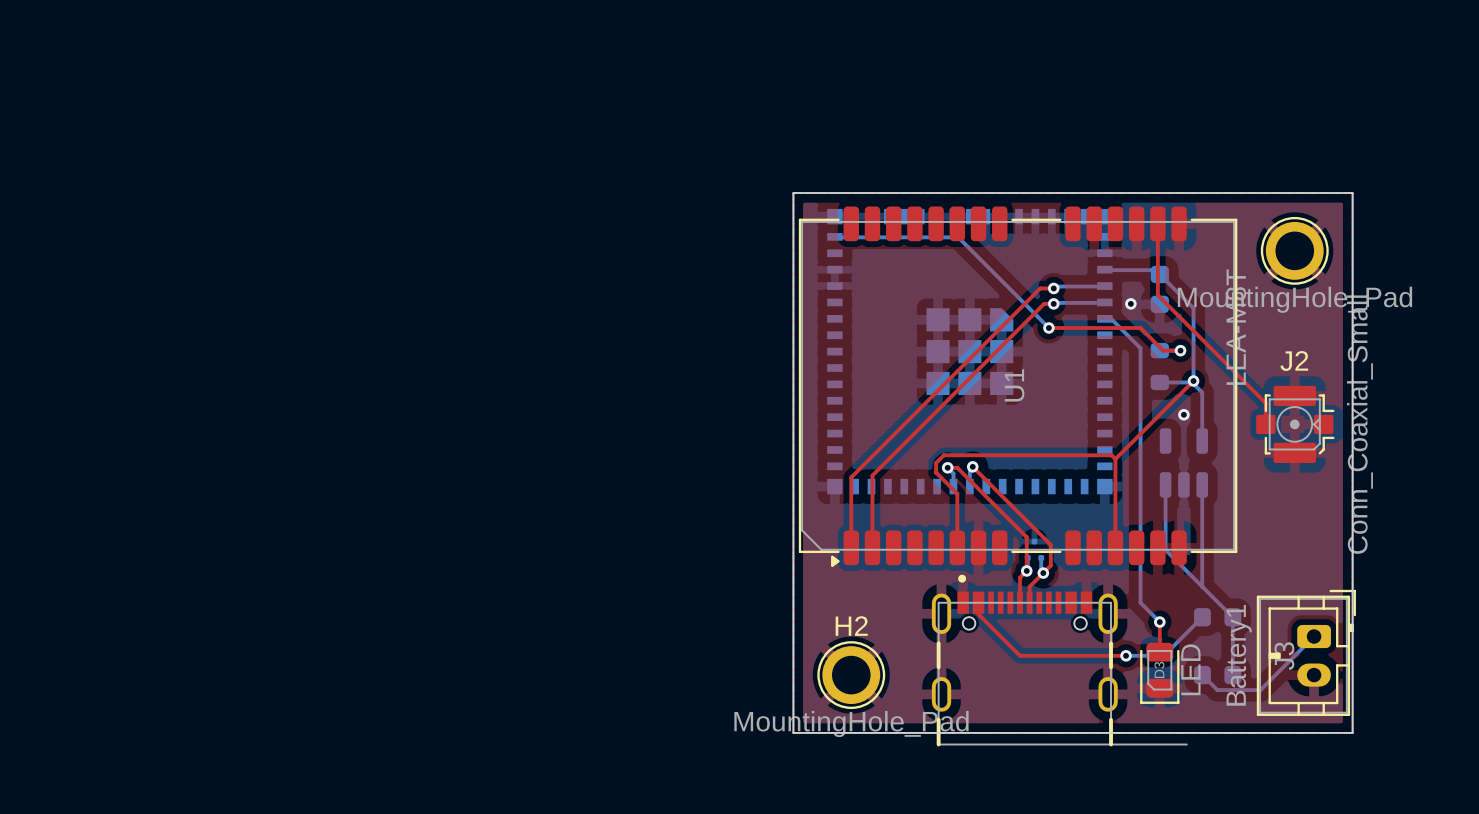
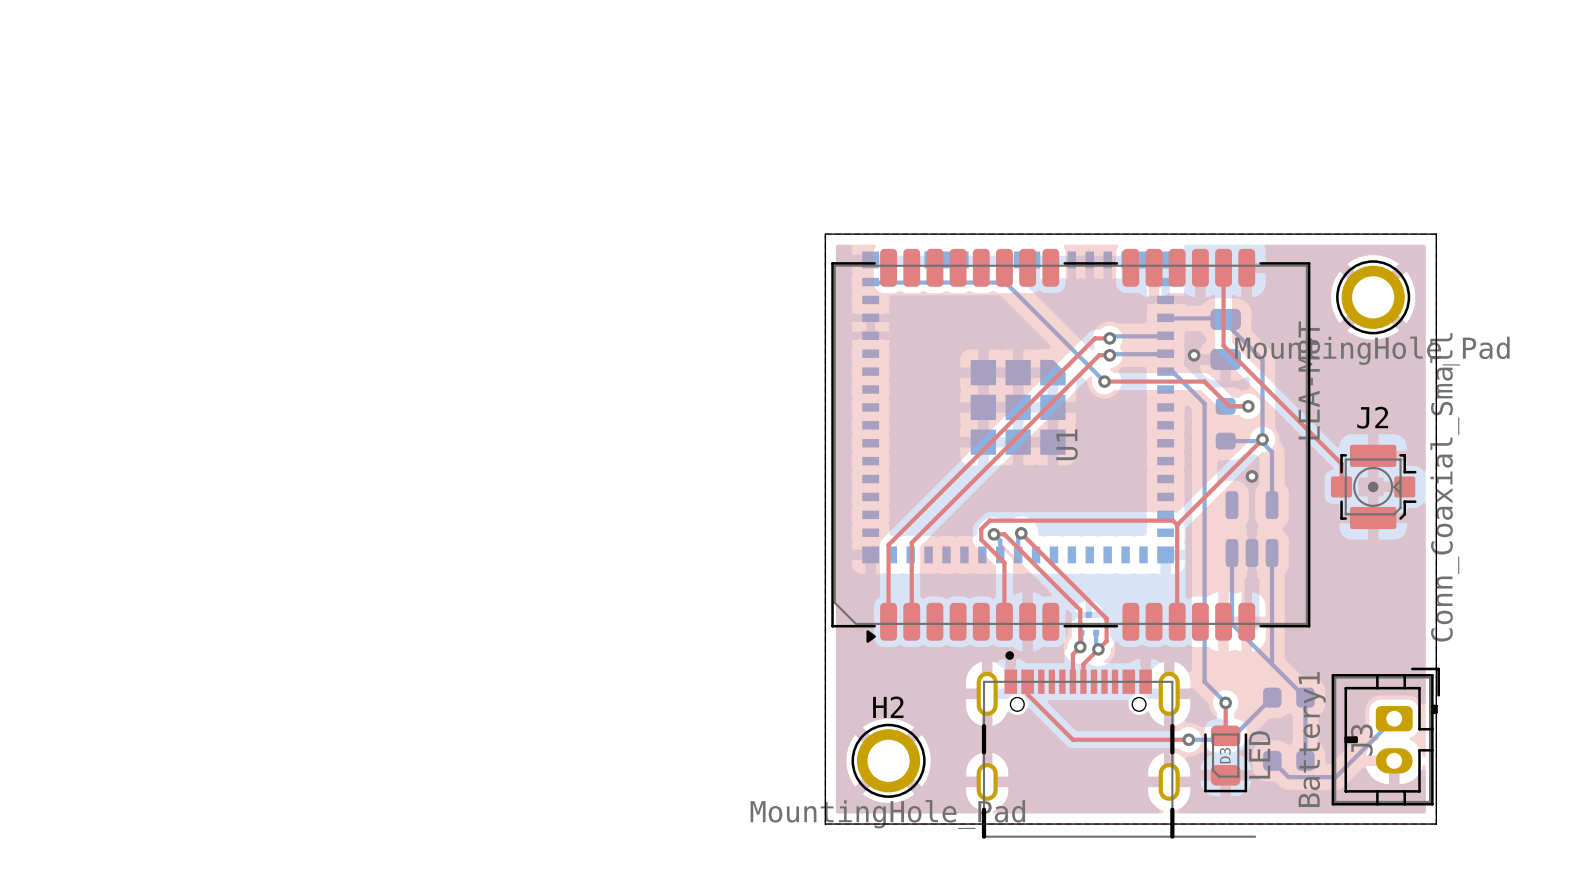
part footprint: [1150, 265, 1169, 314] -> [1210, 308, 1241, 371]

